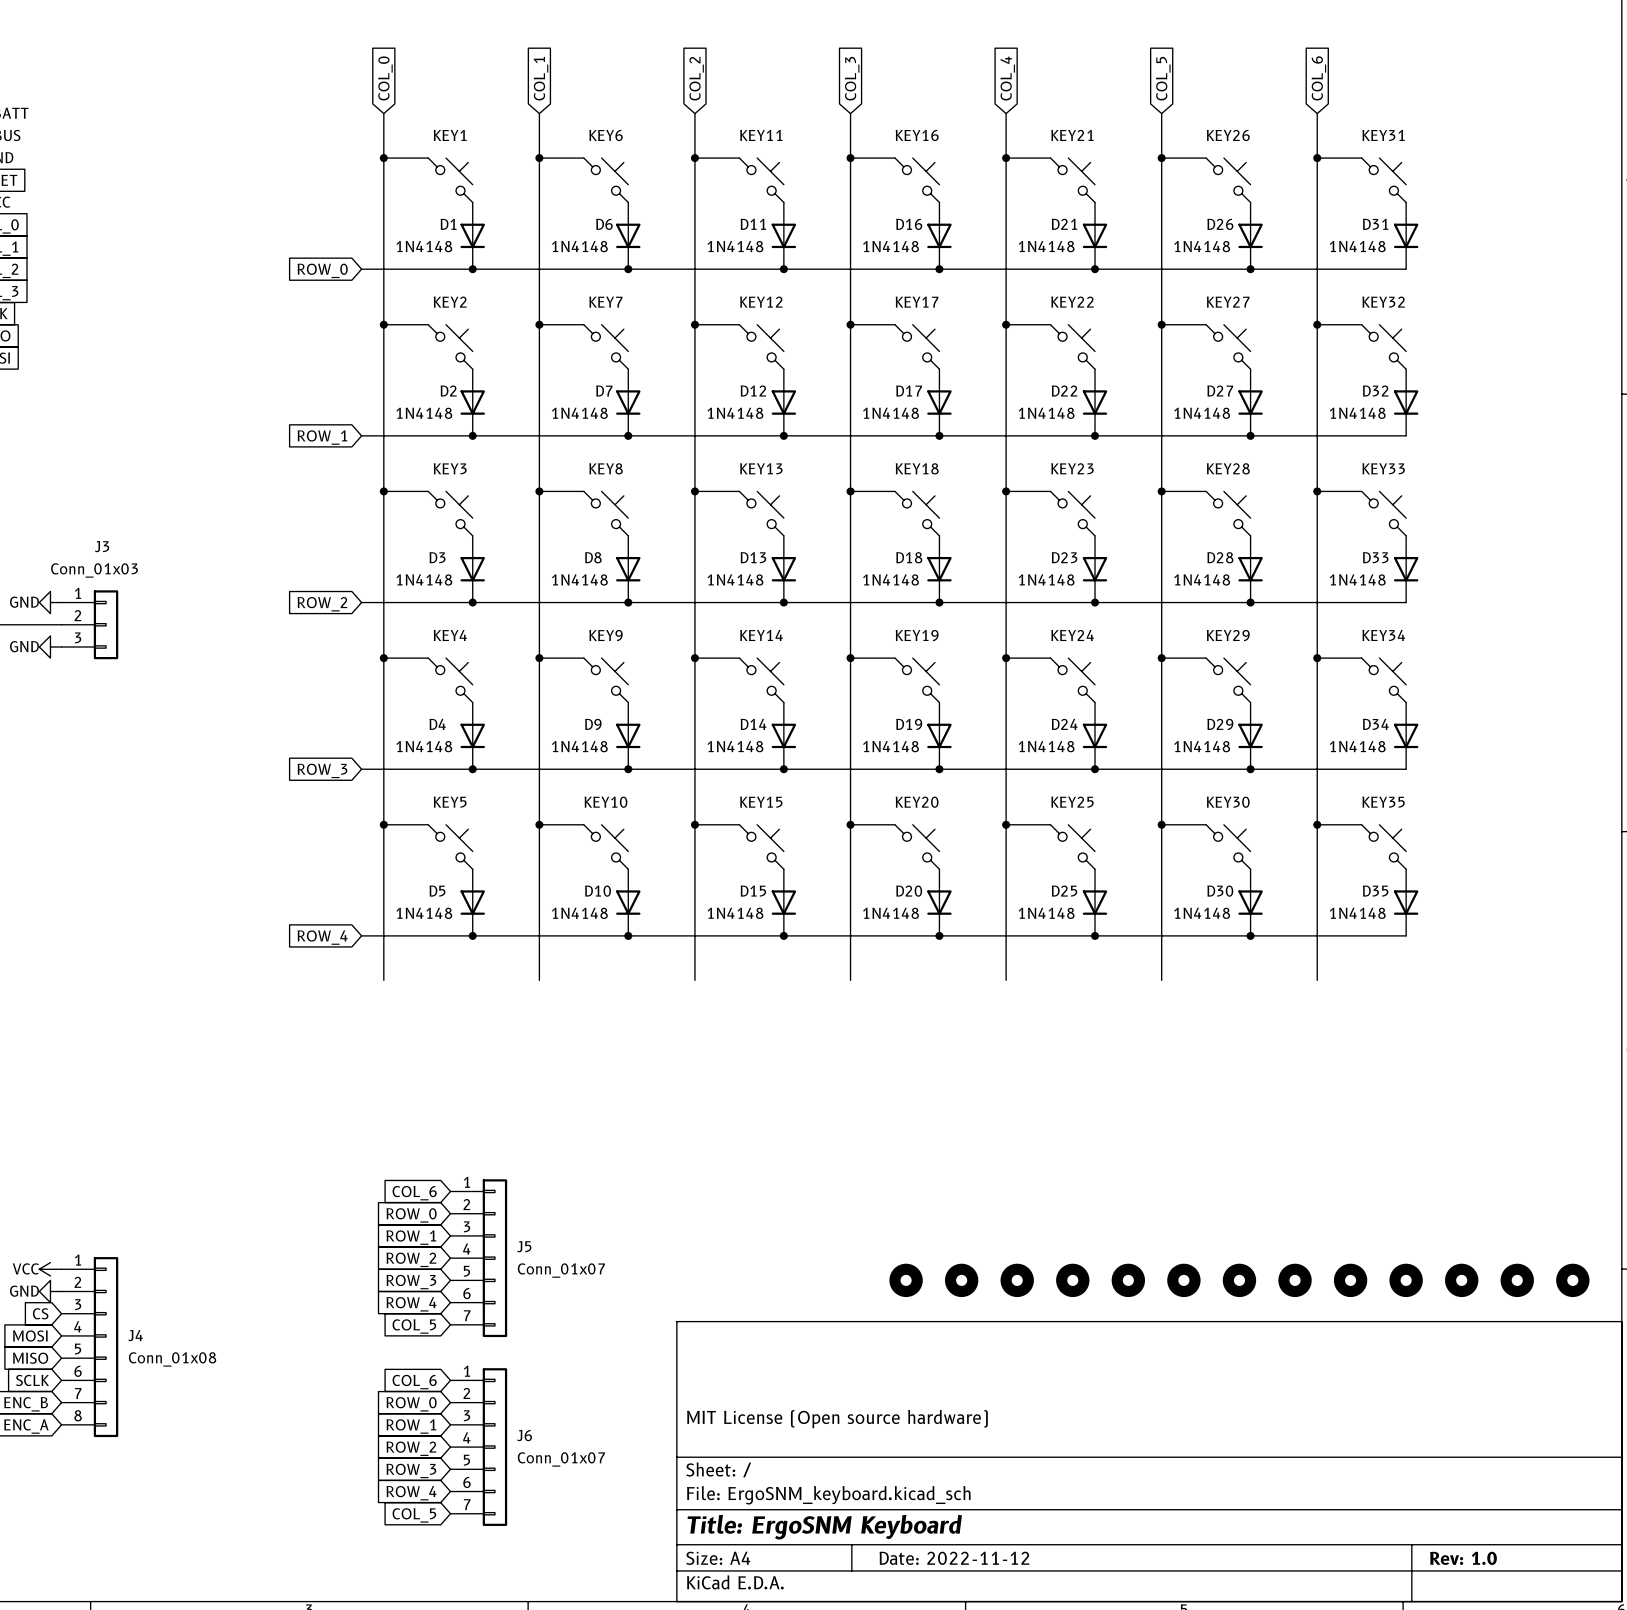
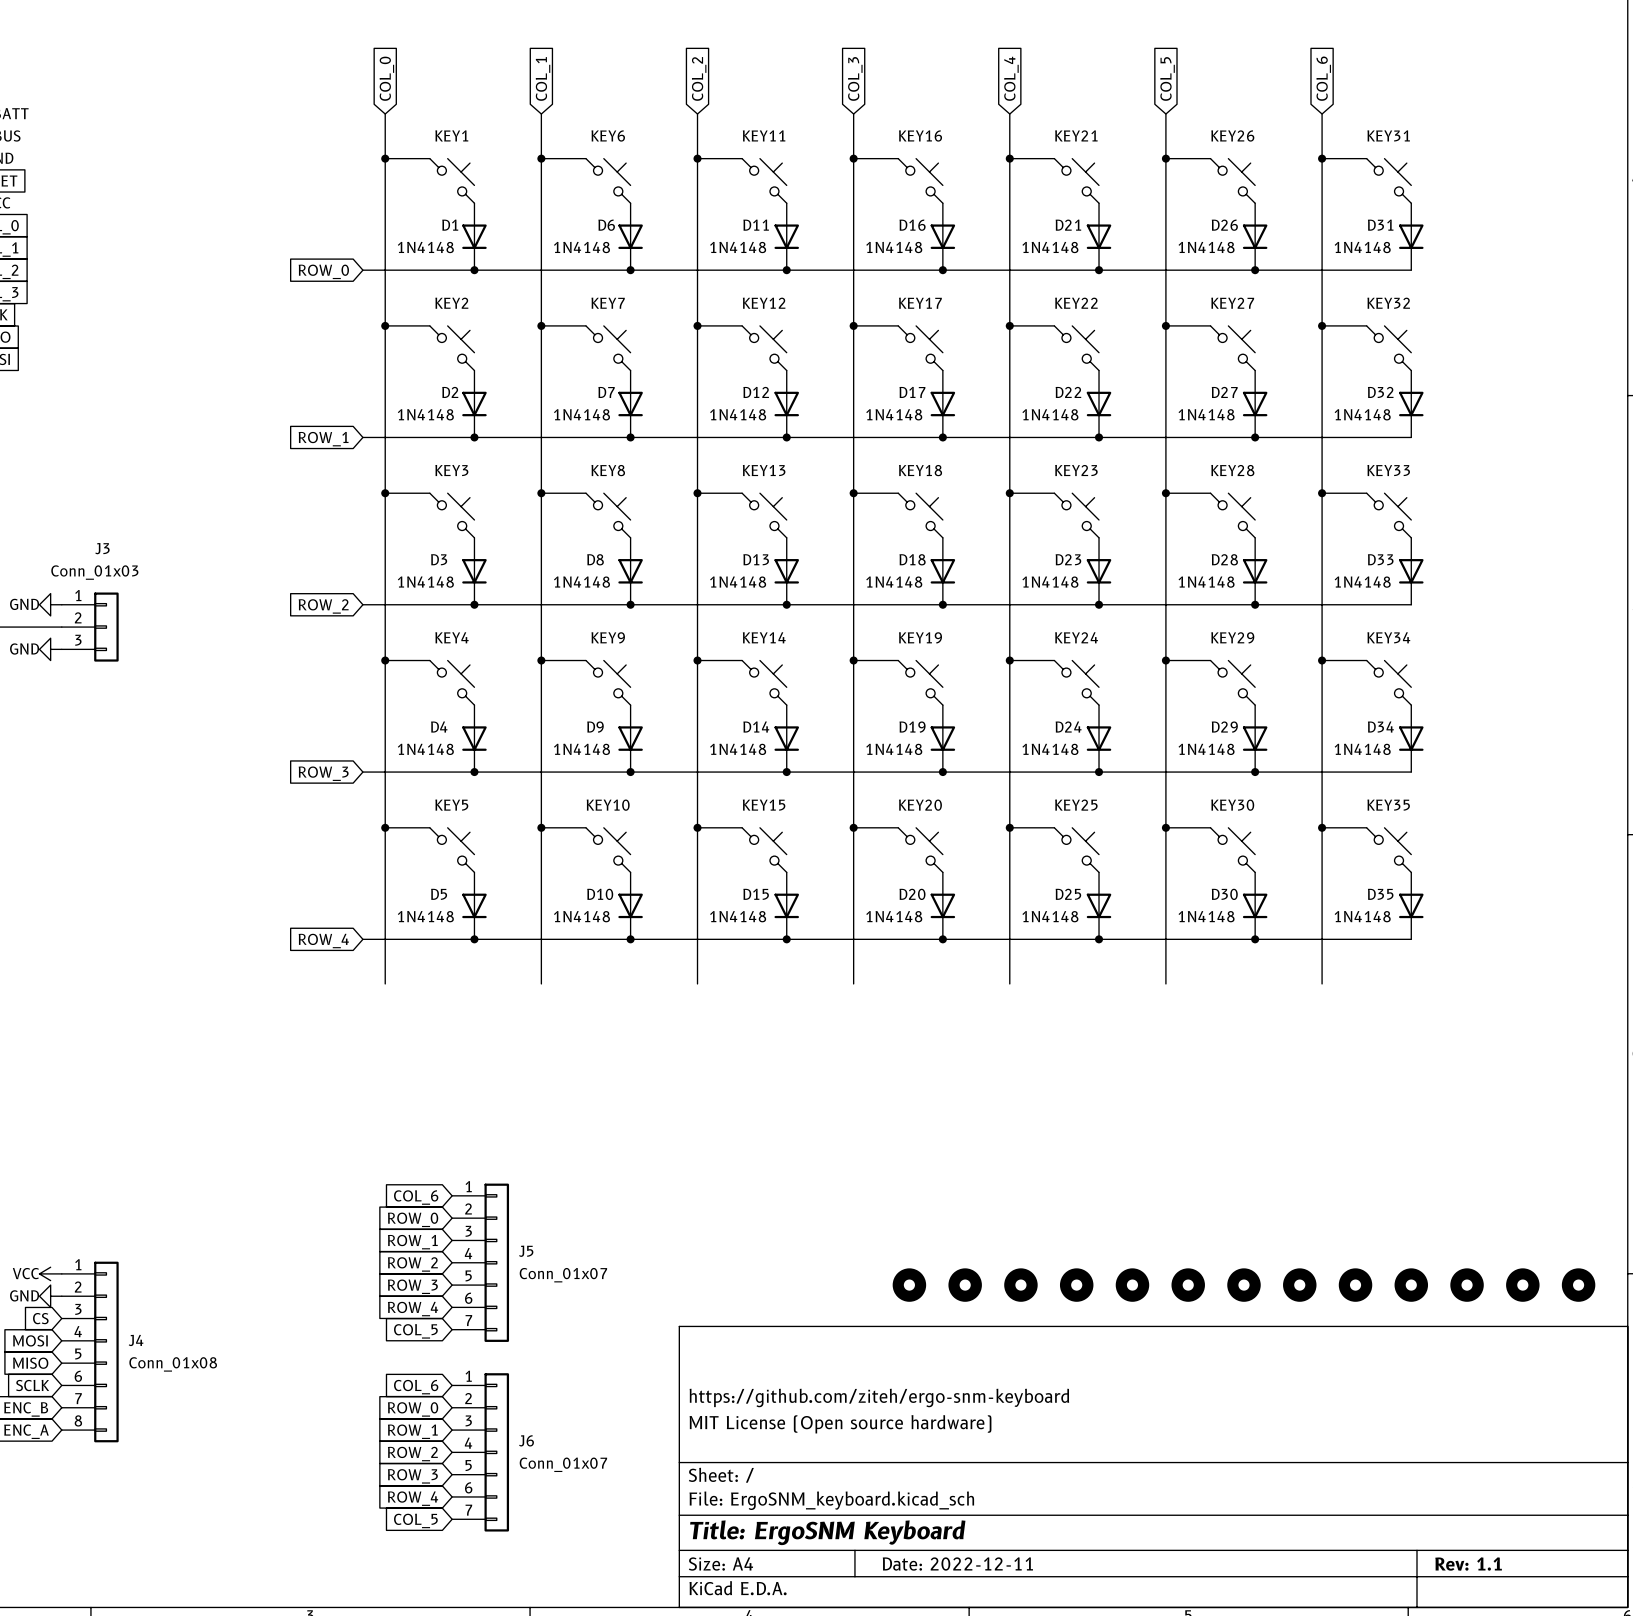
title block: none -> https://github.com/ziteh/ergo-snm-keyboard (879, 1398)
title block: Date: 2022-11-12 (954, 1558) -> Date: 2022-12-11 (957, 1564)
title block: Rev: 1.0 (1463, 1558) -> Rev: 1.1 (1468, 1564)

